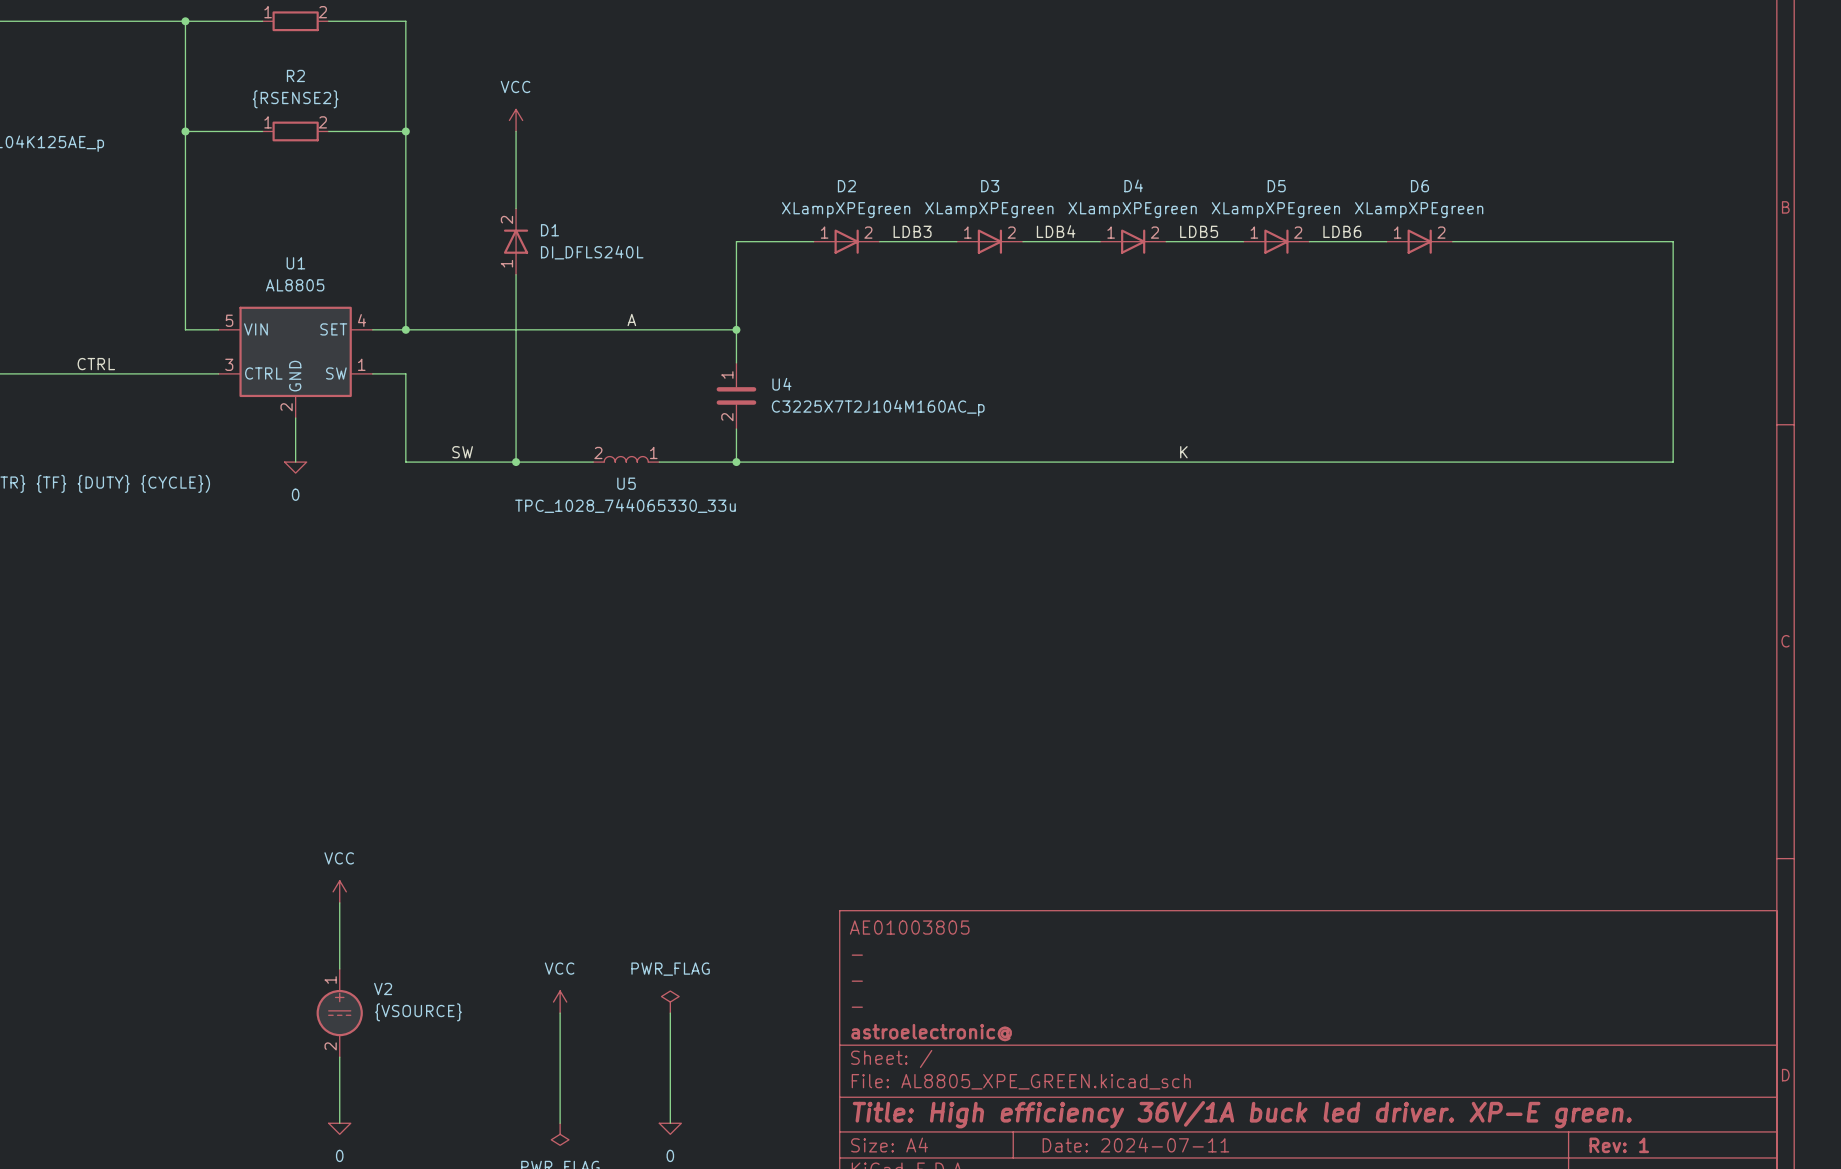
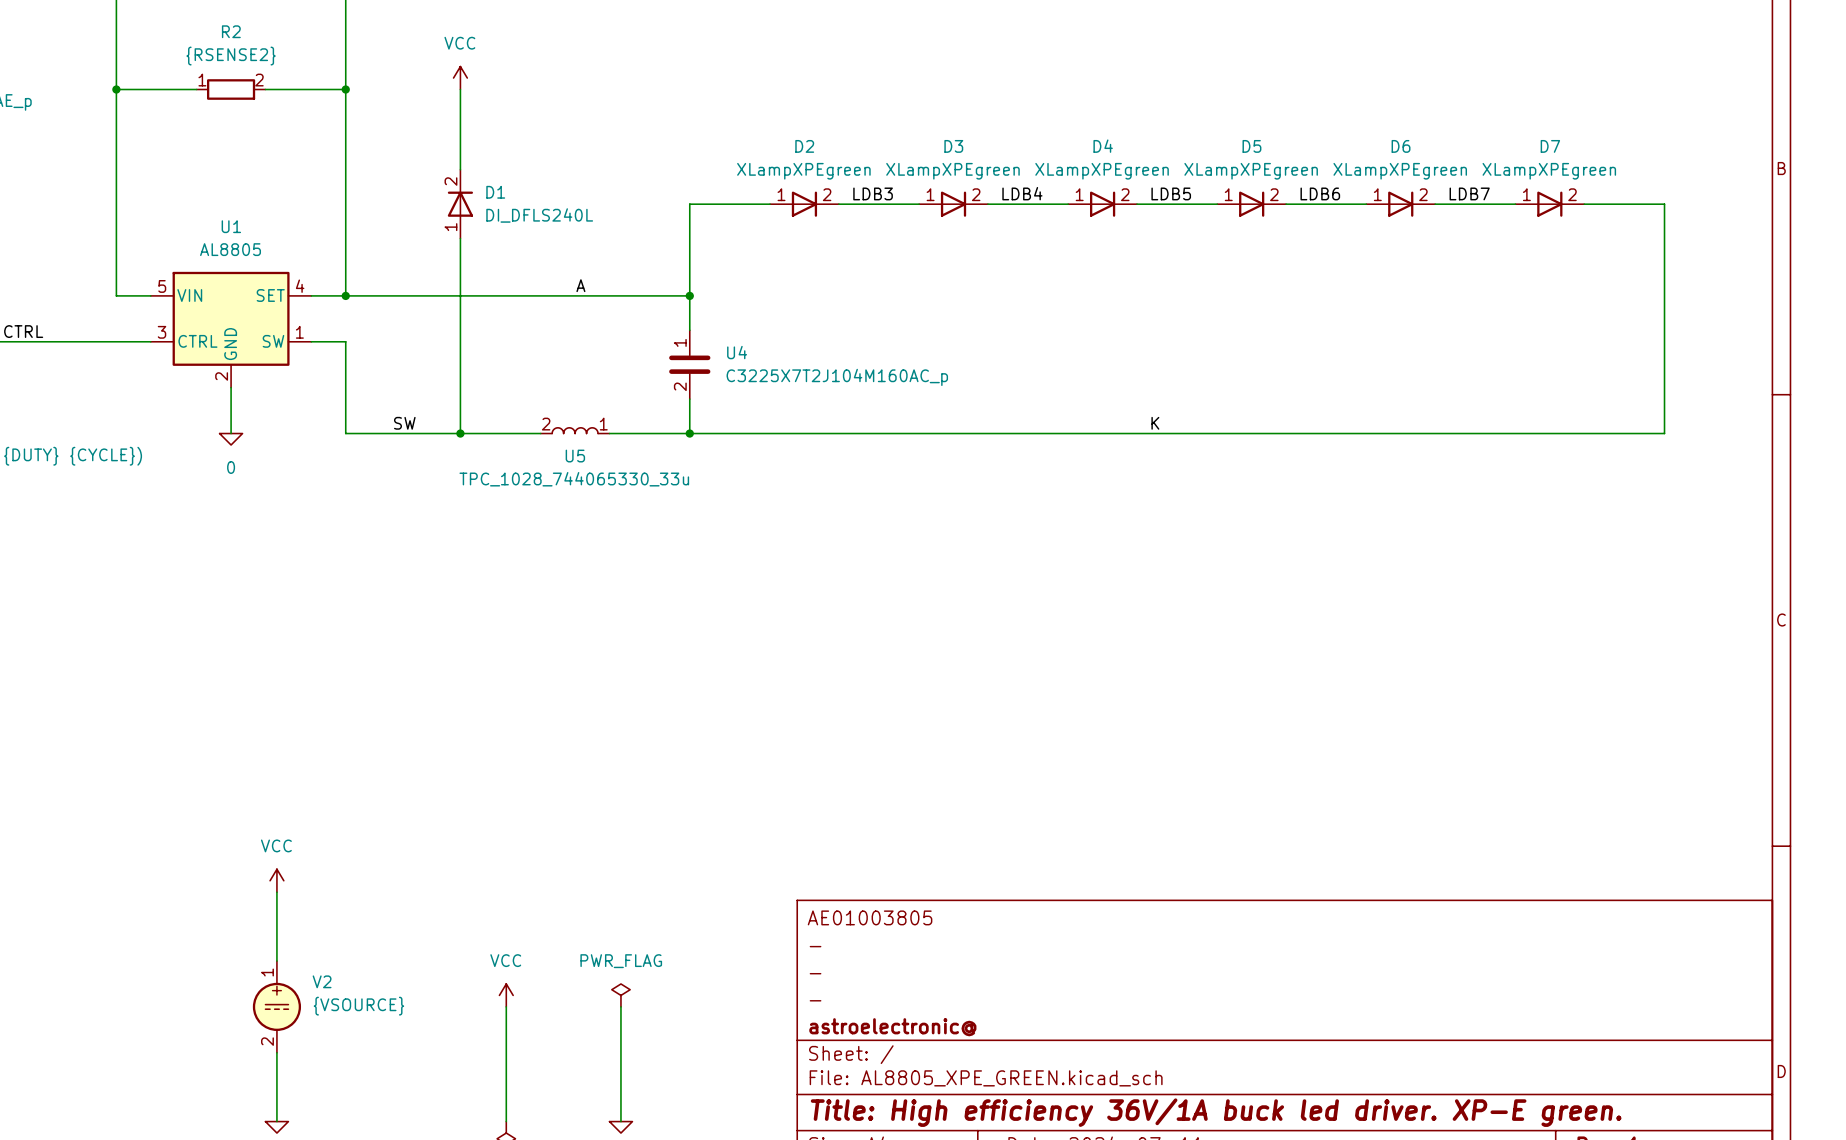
label: none -> LDB7 (1469, 193)
D7: none -> XLampXPEgreen (1549, 204)

